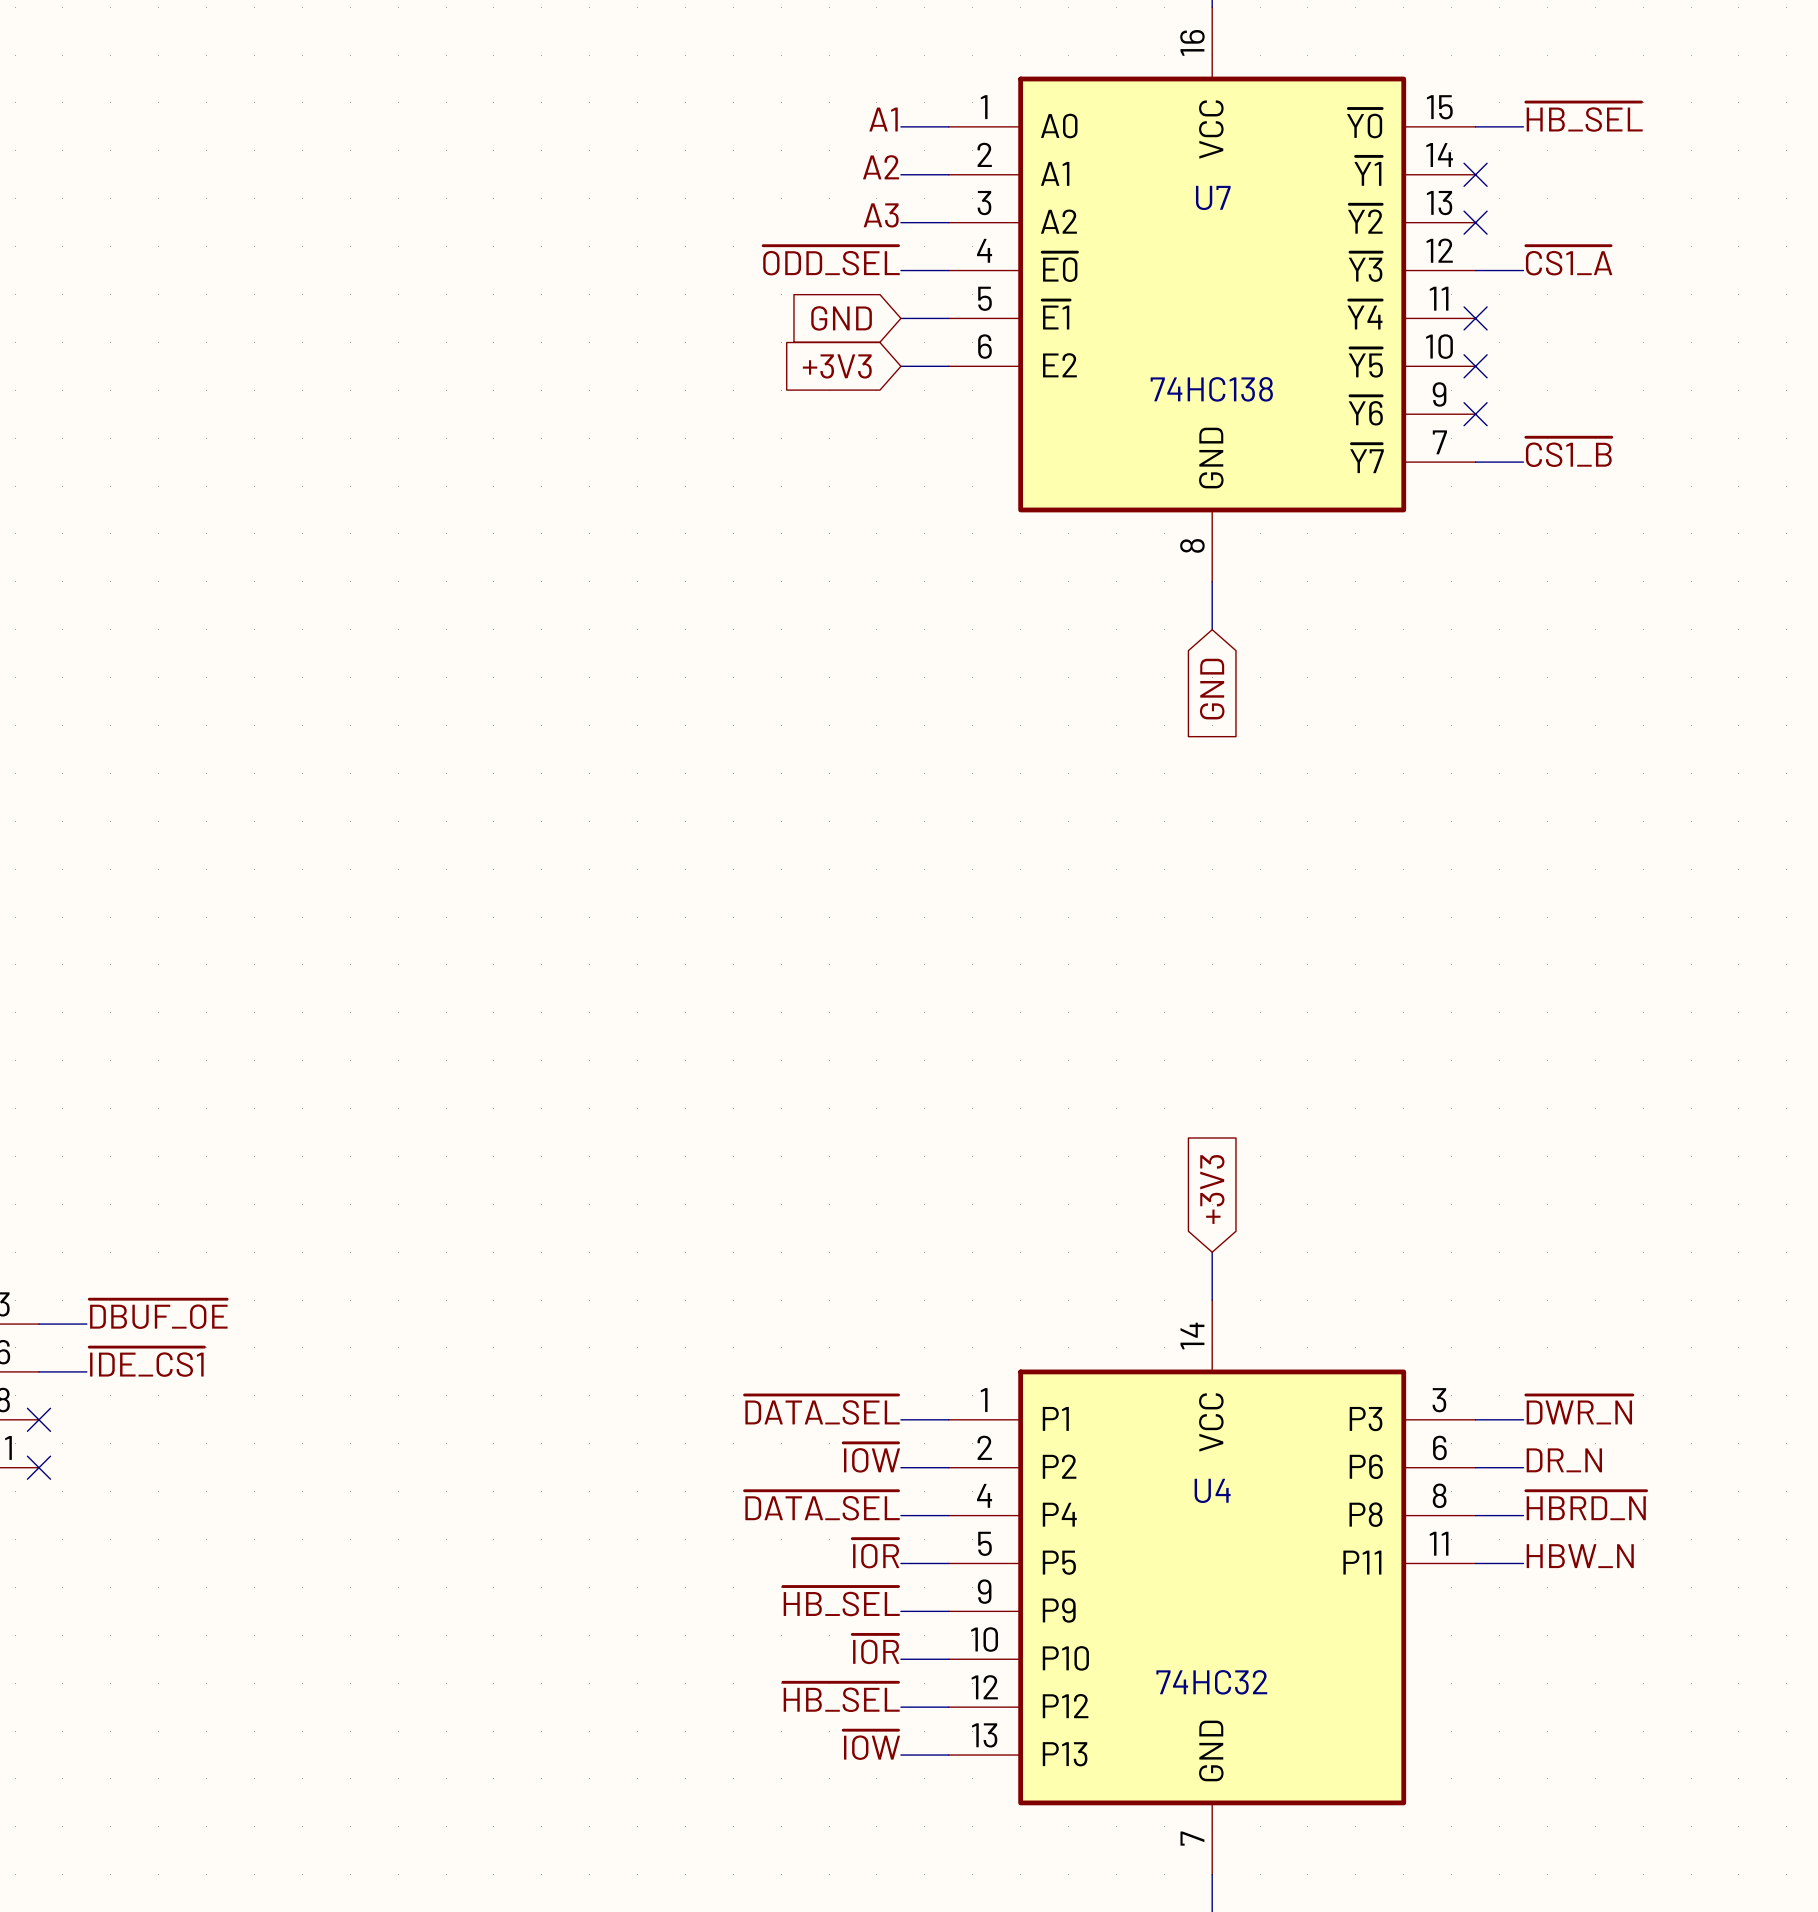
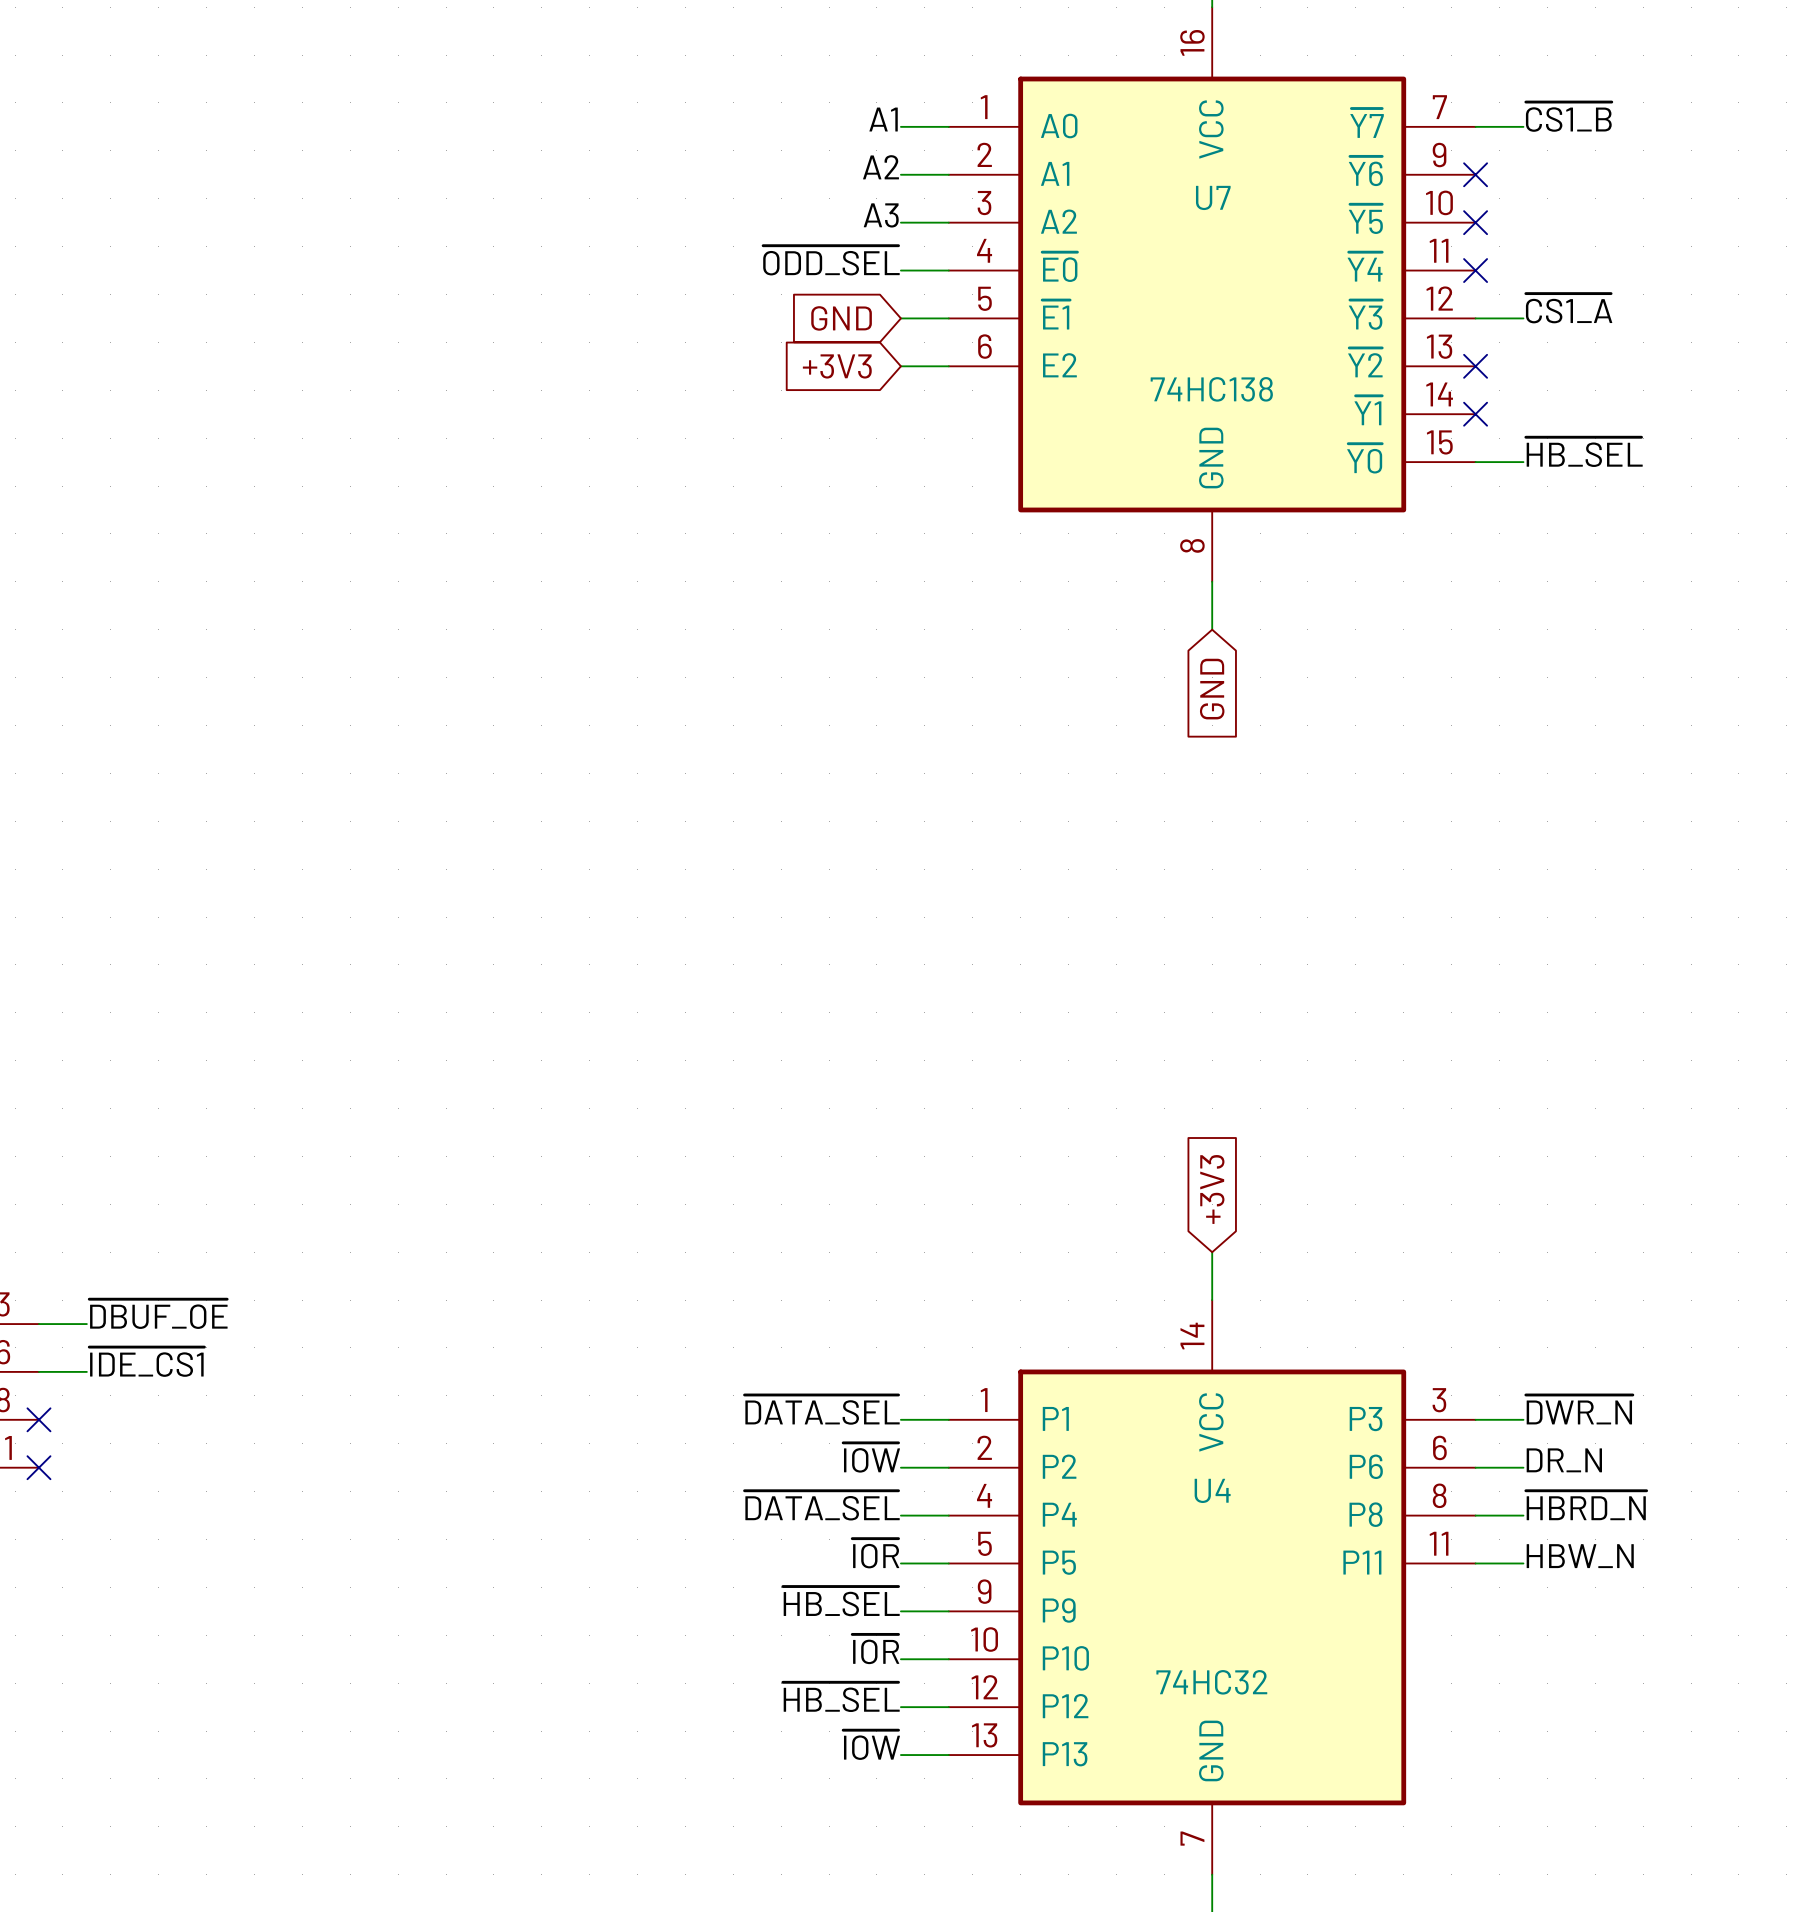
U7 symbol: [948, 7, 1476, 582] -> [948, 7, 1476, 582]
label: ~{HB_SEL} (1584, 116) -> ~{CS1_B} (1568, 116)
label position: ~{CS1_A} (1569, 260) -> ~{CS1_A} (1569, 308)
wire: (1475, 270) (1523, 270) -> (1475, 318) (1523, 318)
no-connect mark position: (1475, 318) -> (1475, 270)
label: ~{CS1_B} (1568, 452) -> ~{HB_SEL} (1584, 452)

